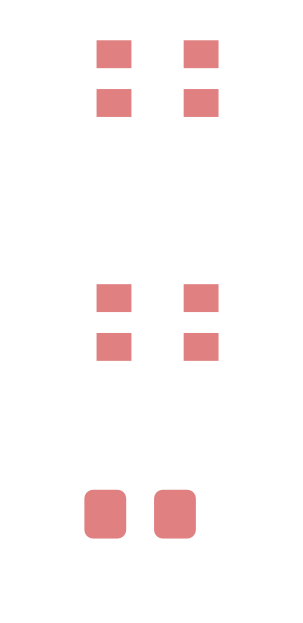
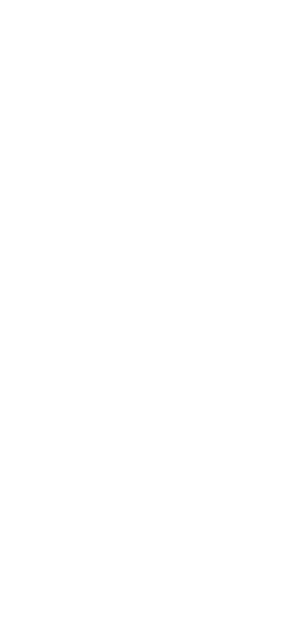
part: (157, 78) -> none
part: (157, 322) -> none
part: (140, 514) -> none

